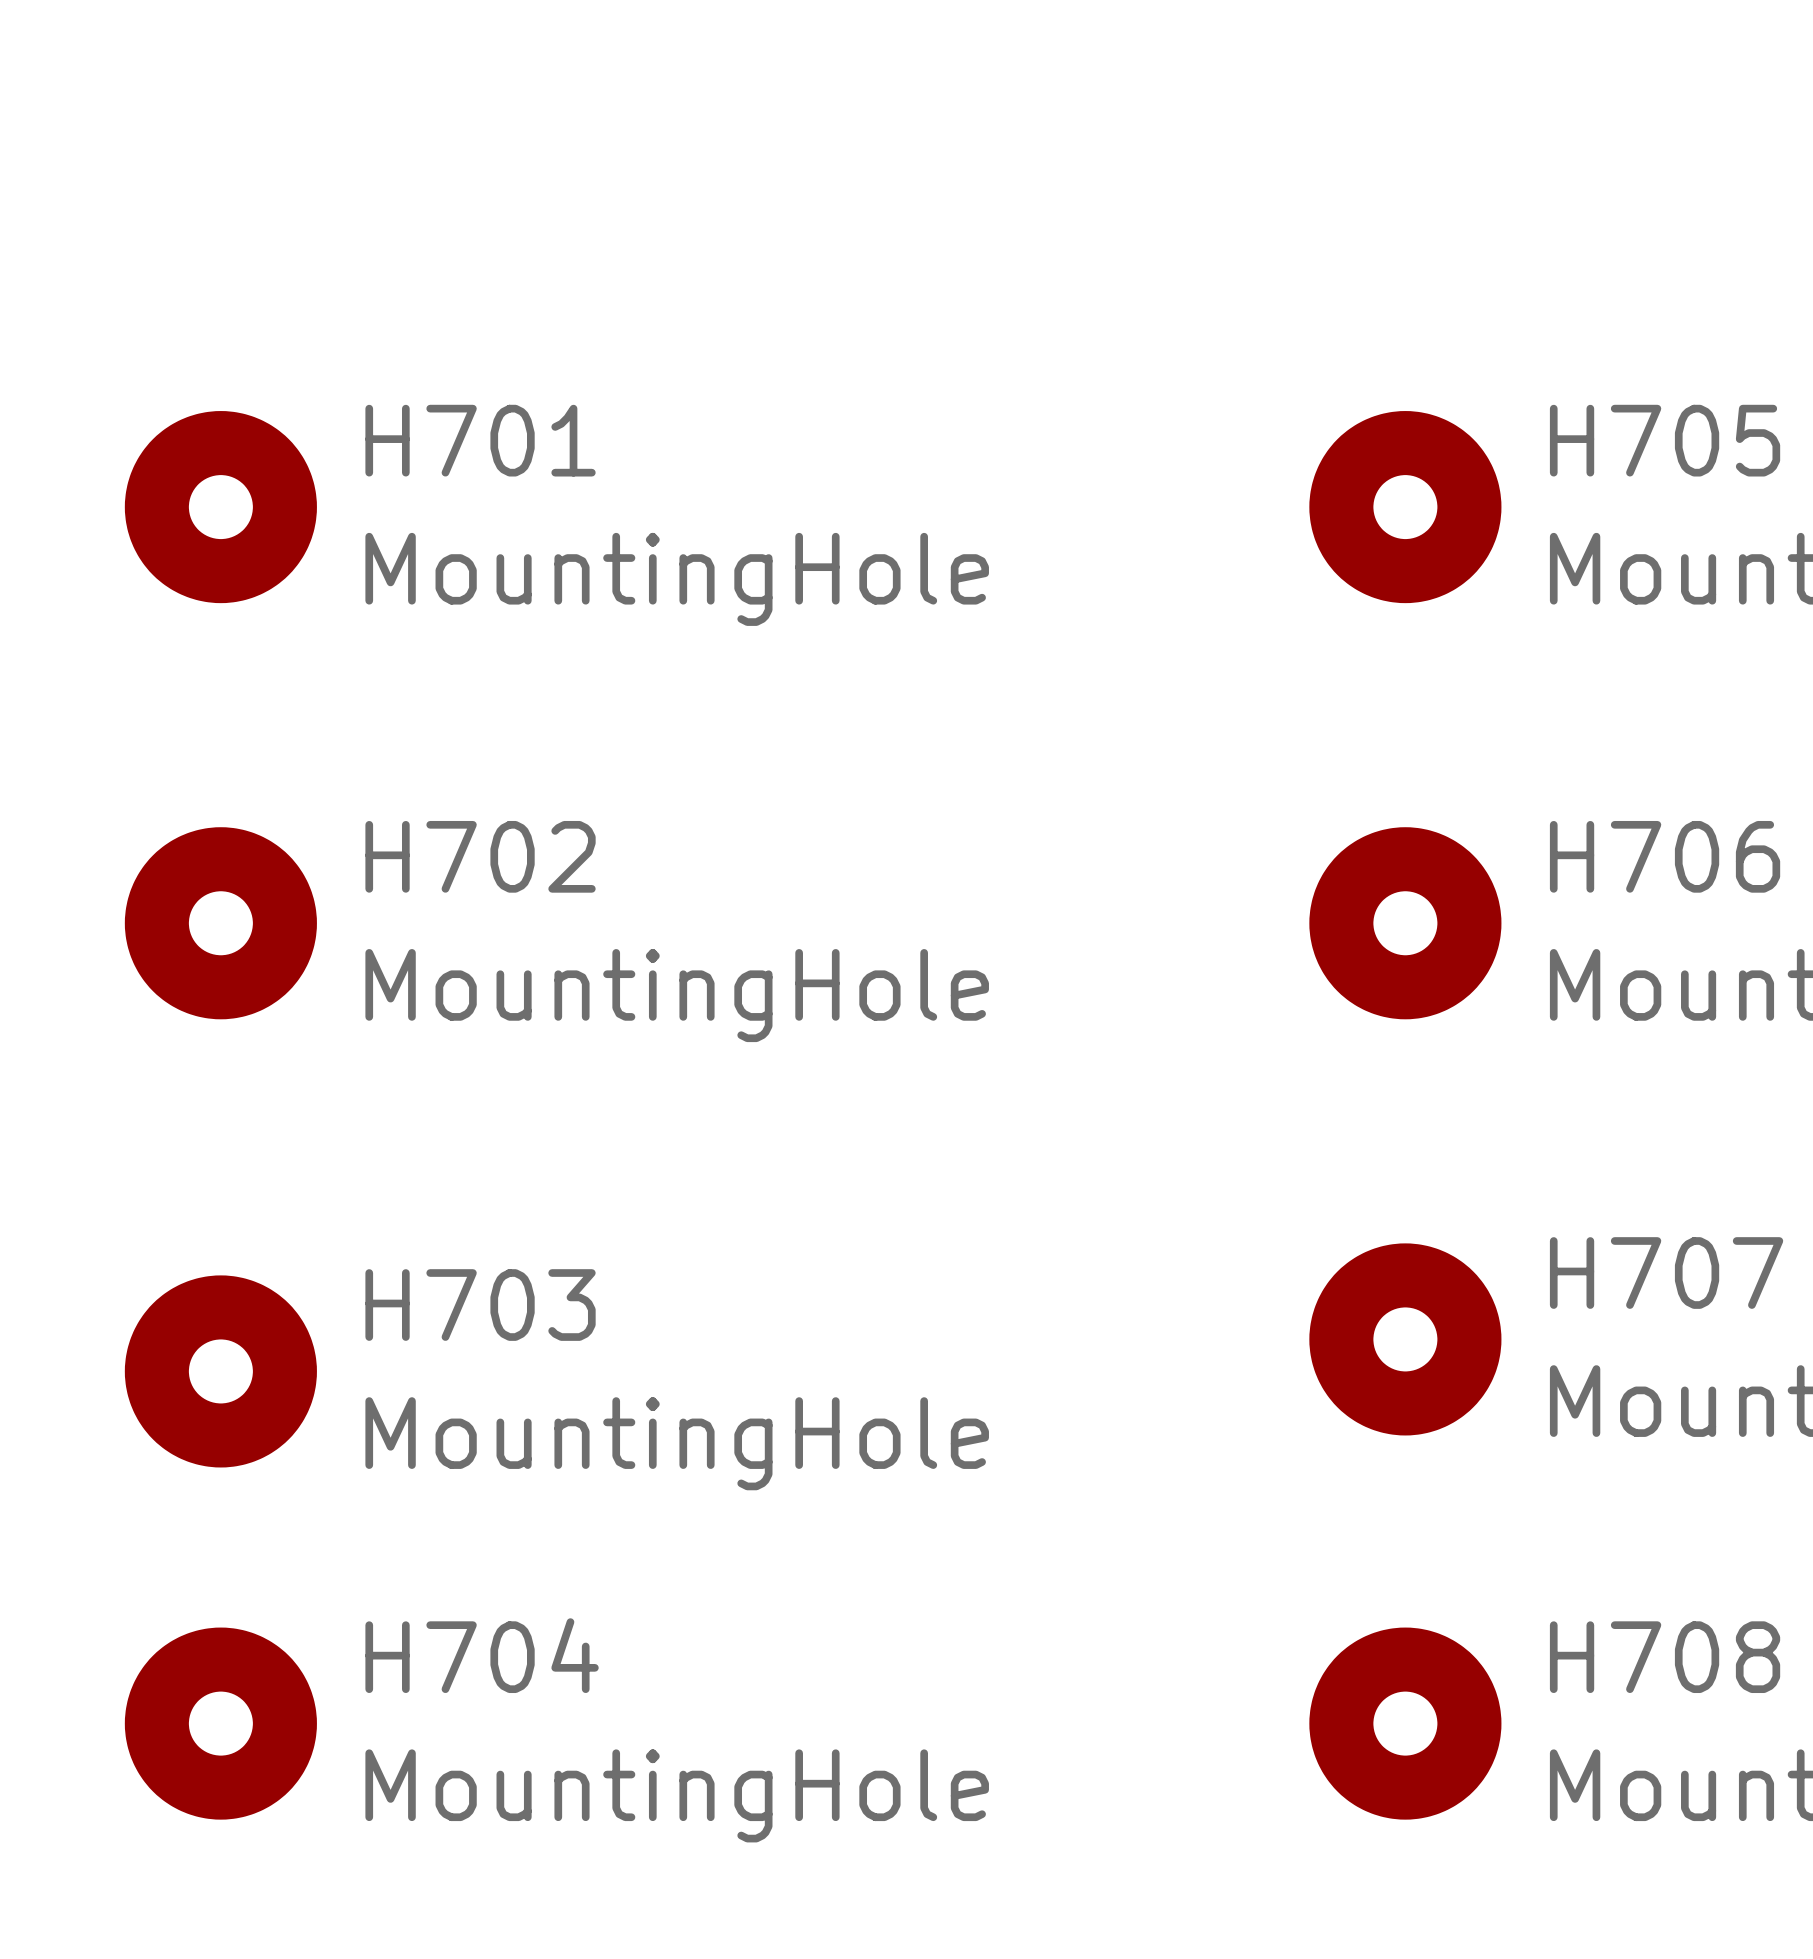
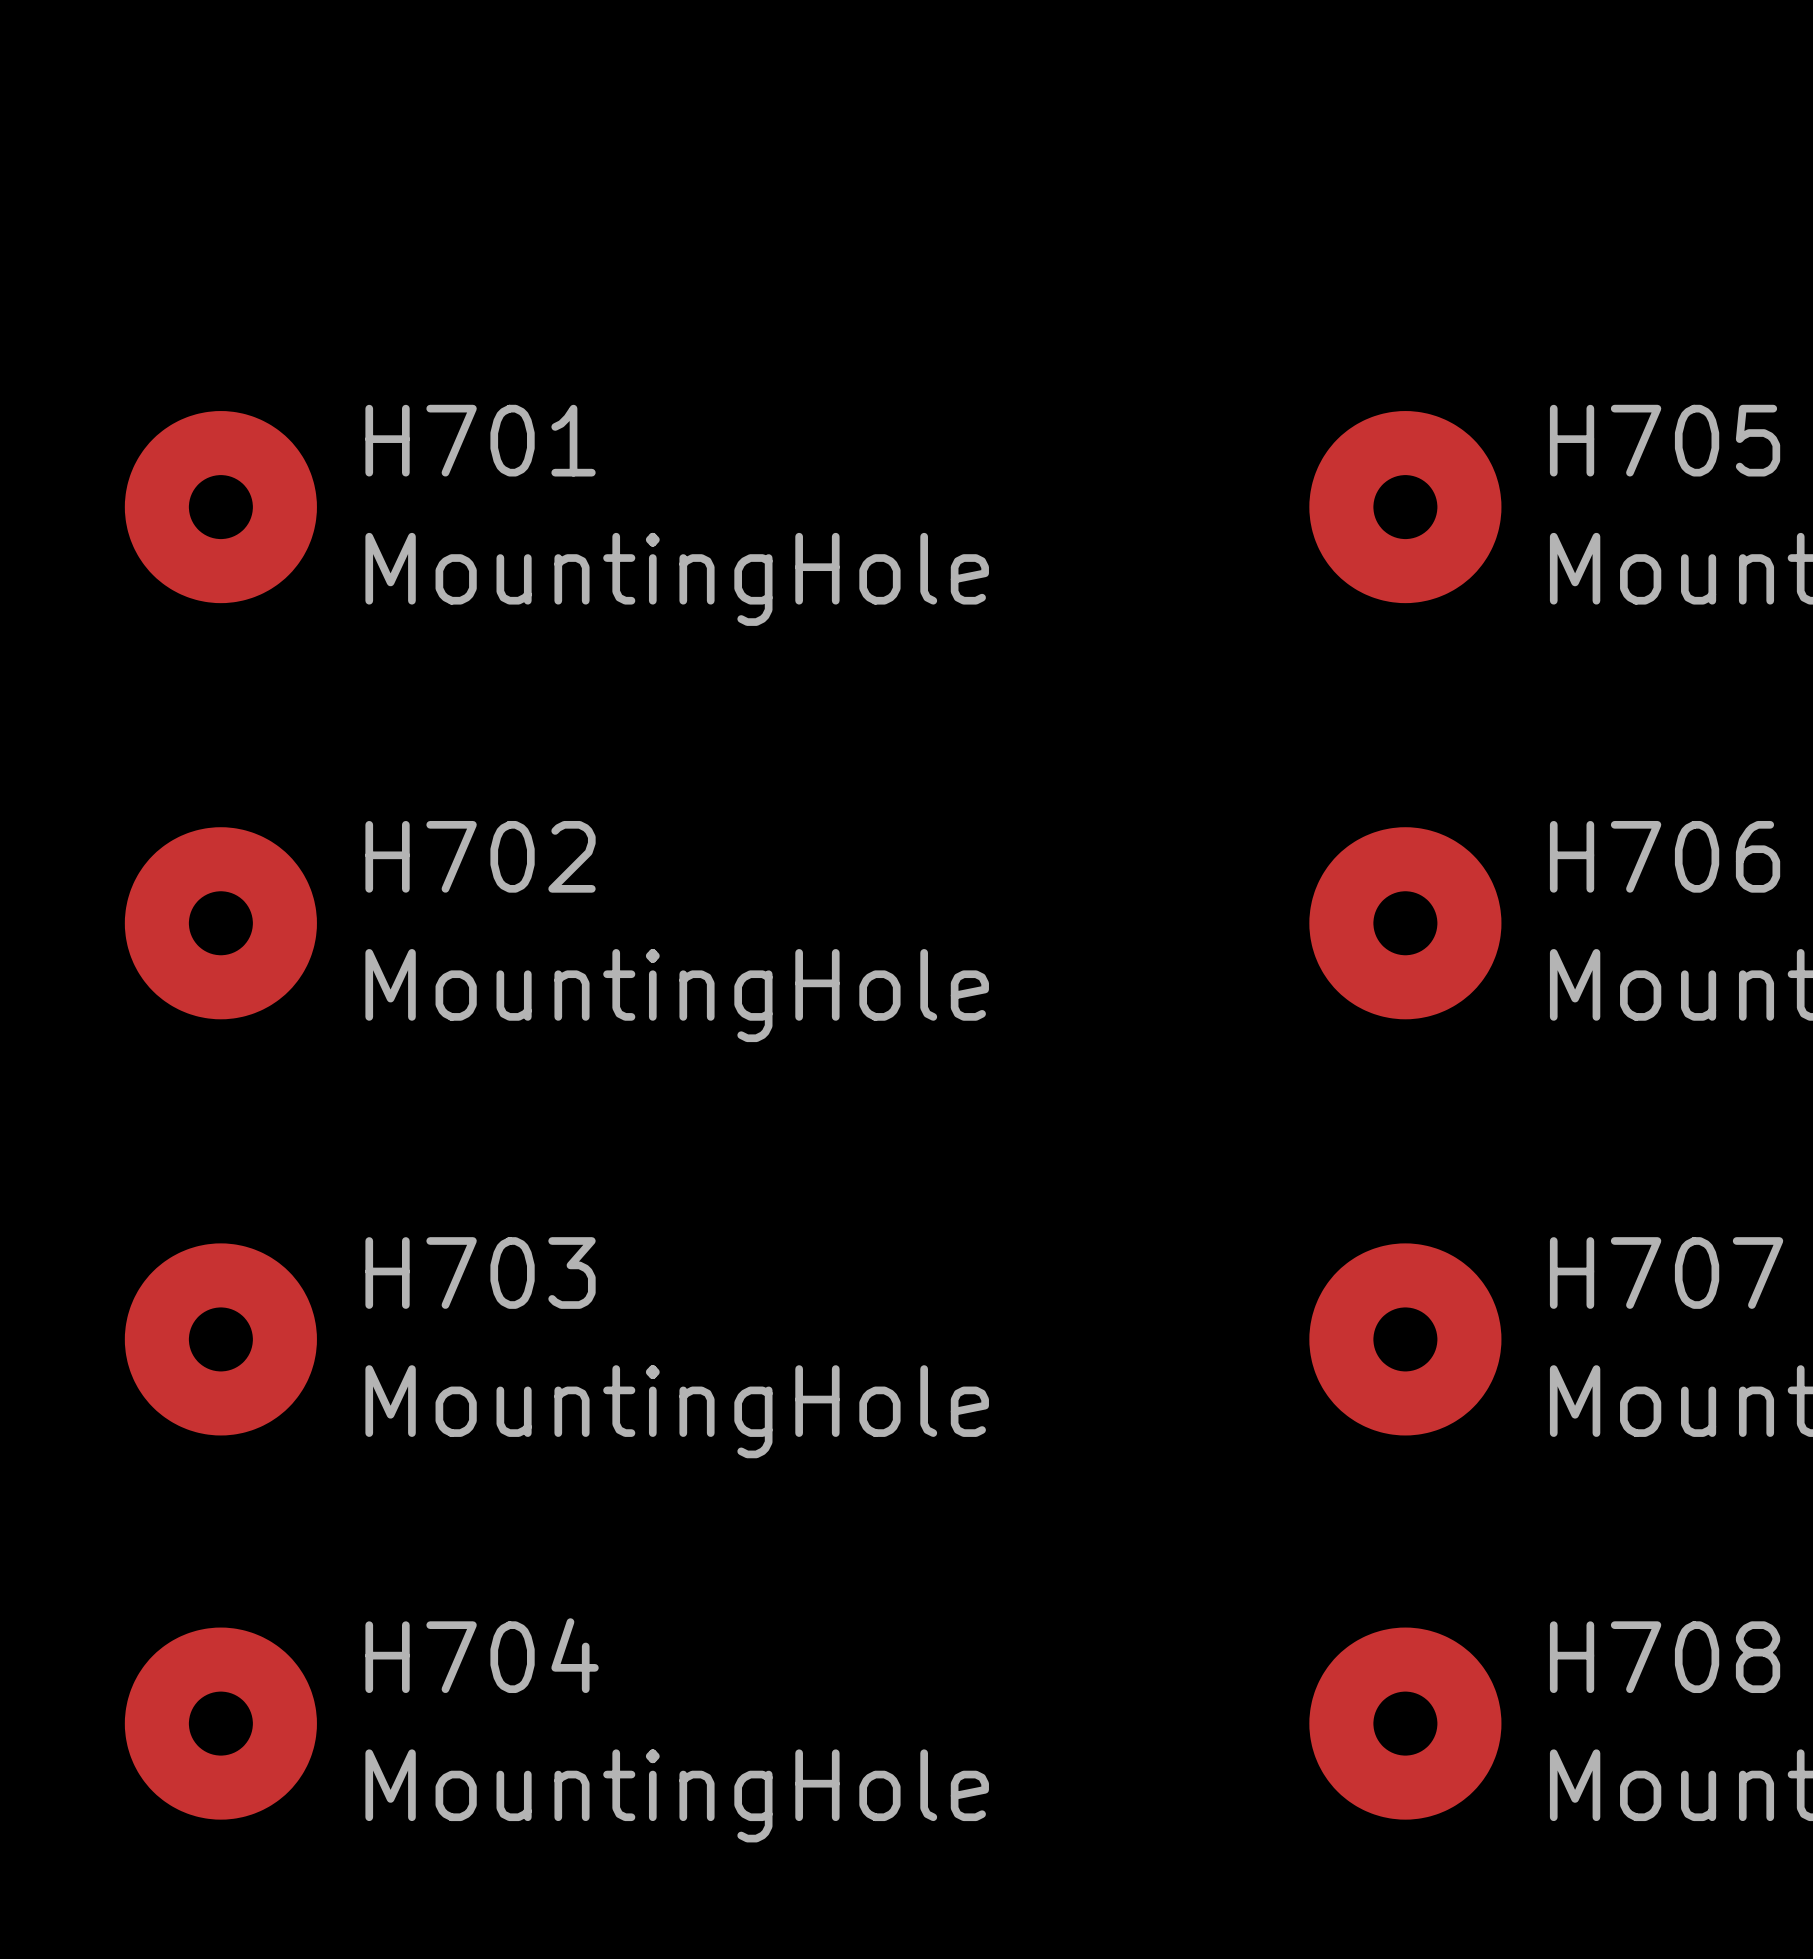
H703 position: (220, 1371) -> (220, 1339)

